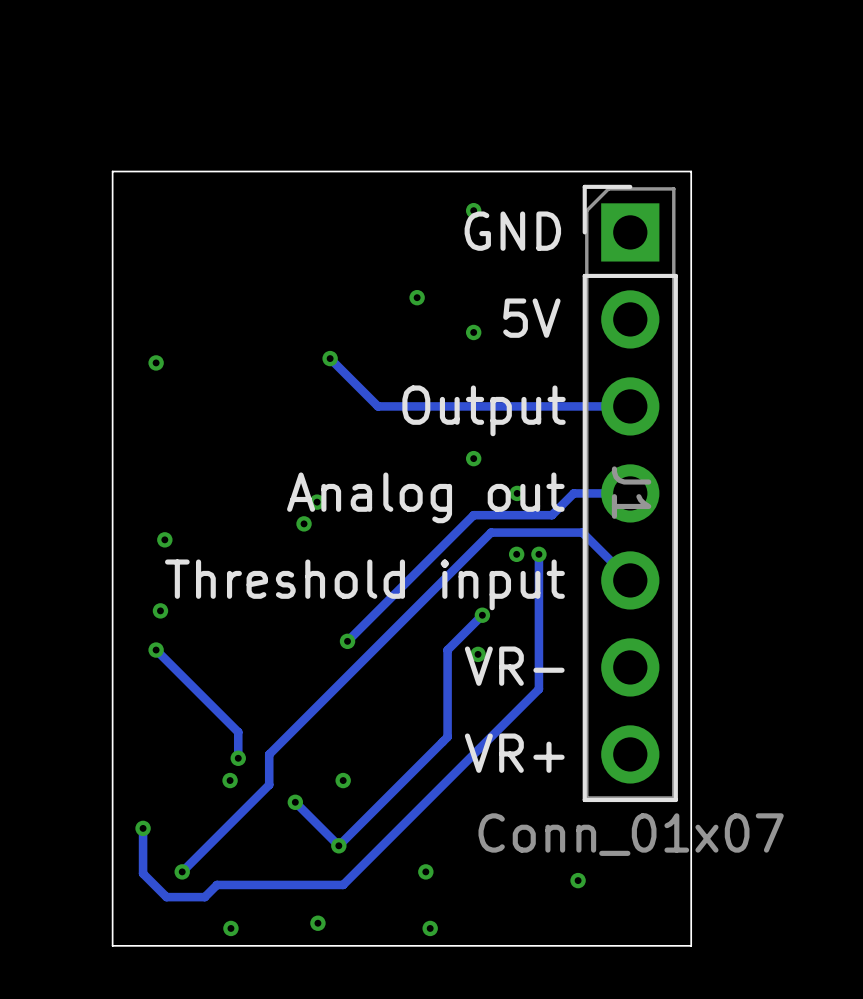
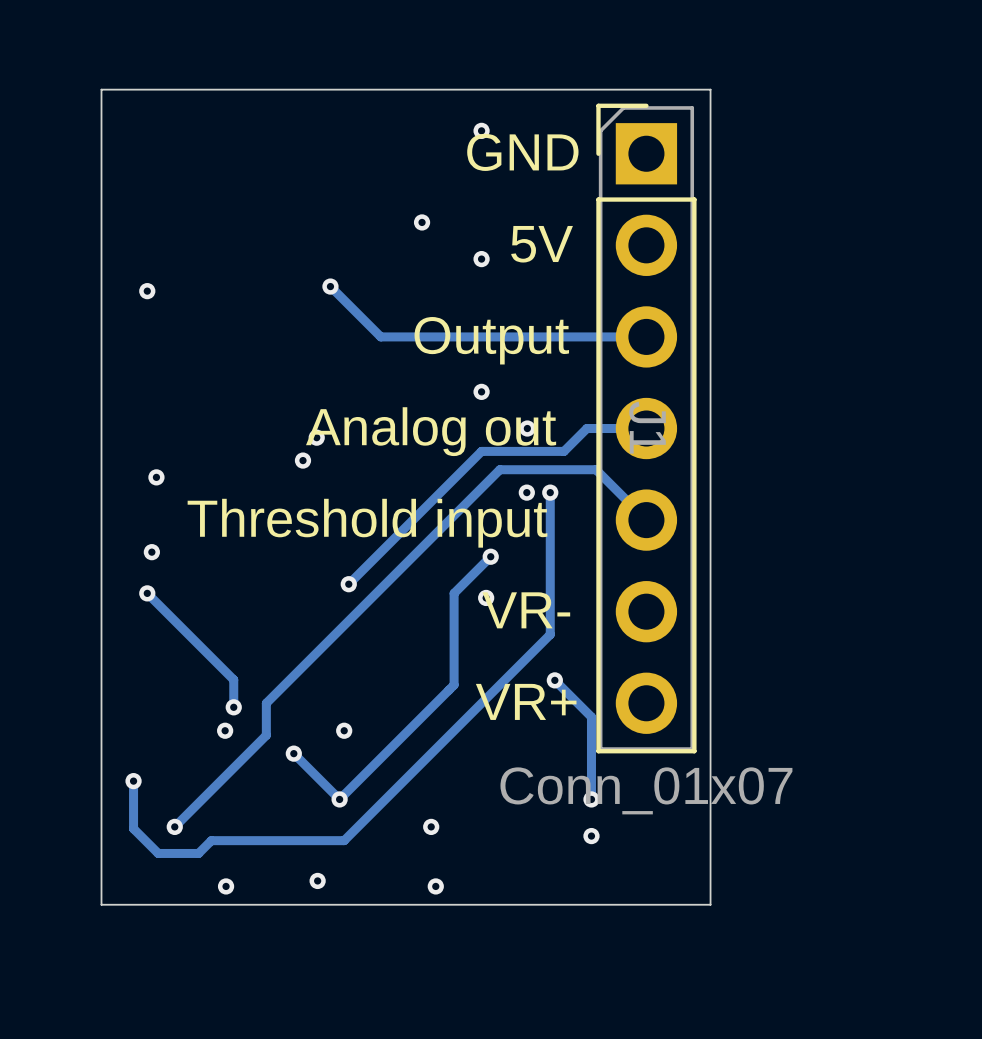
track: none -> (554, 680) (591, 717) (591, 799)
via: none -> (554, 680)
via: none -> (591, 799)

